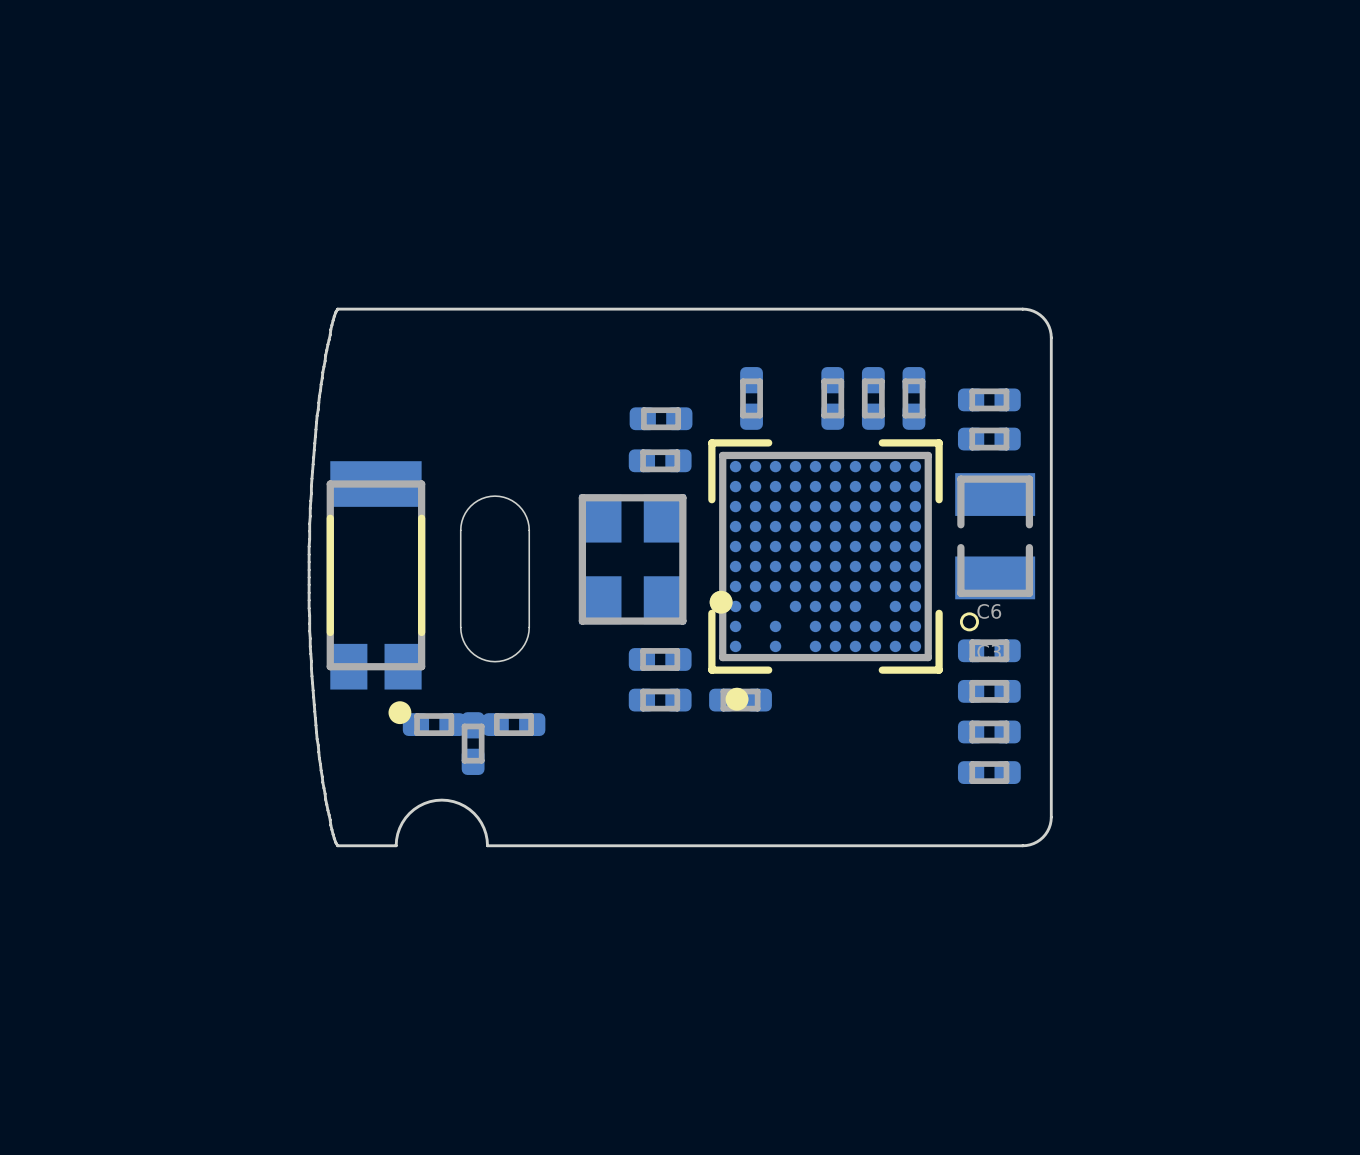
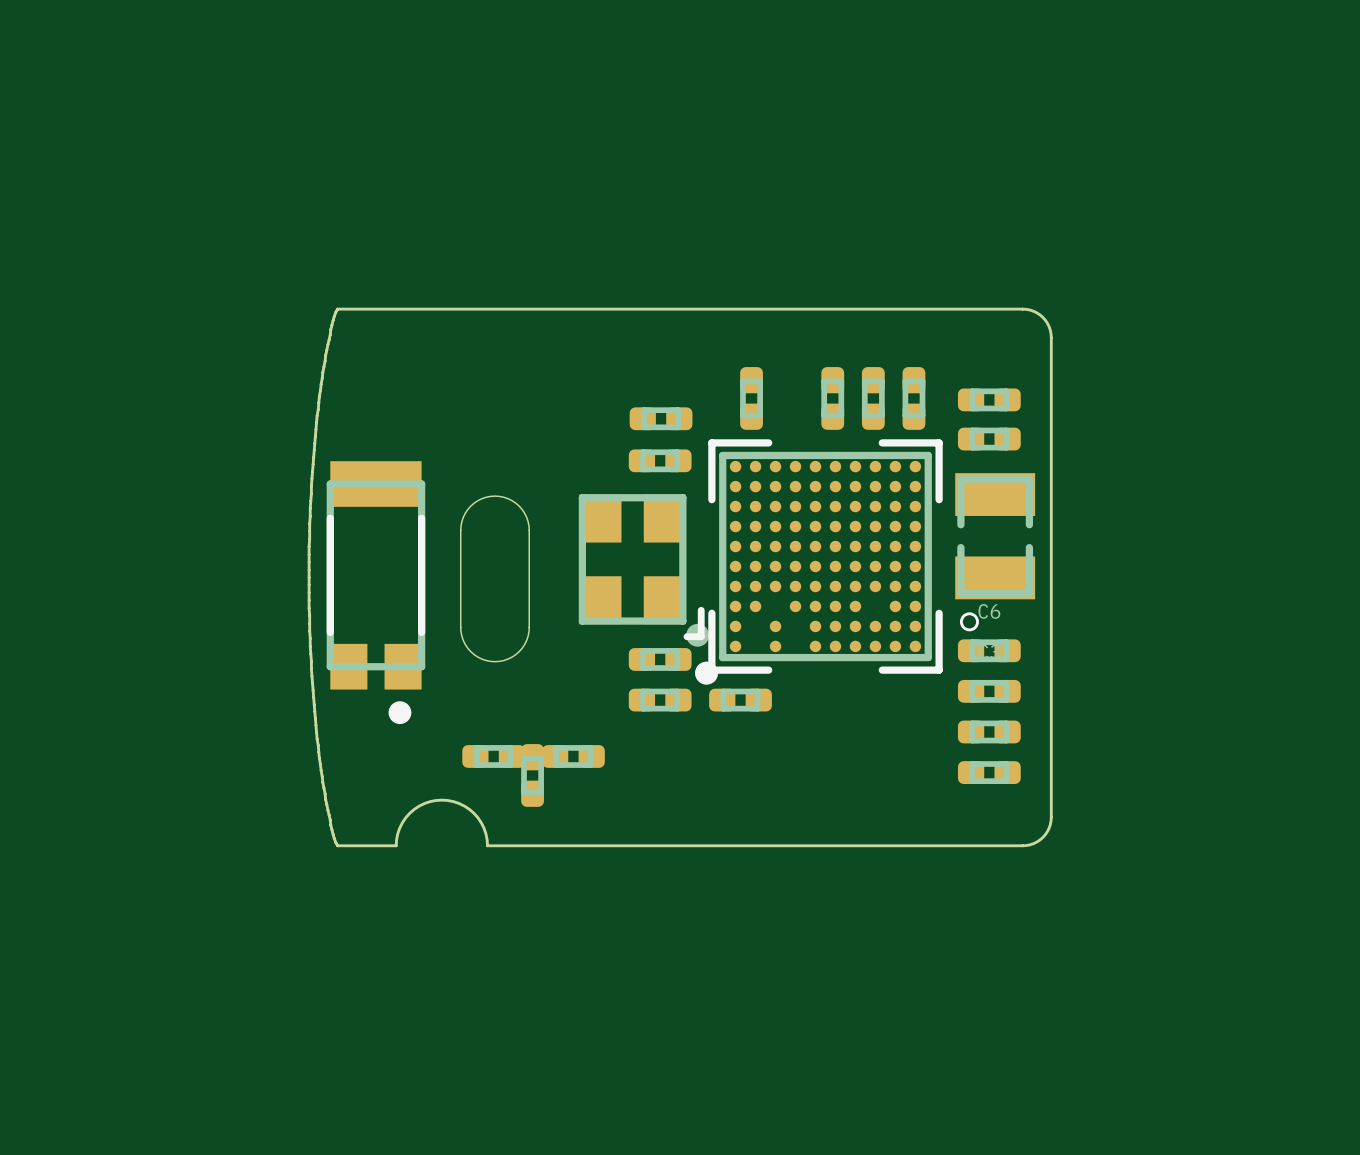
part footprint: [708, 439, 943, 711] -> [695, 439, 943, 685]
part footprint: [578, 494, 733, 625] -> [578, 494, 710, 647]
part: (434, 724) -> none
part: (513, 724) -> none
part: (473, 743) -> none
part: none -> (493, 756)
part: none -> (573, 756)
part: none -> (532, 775)

